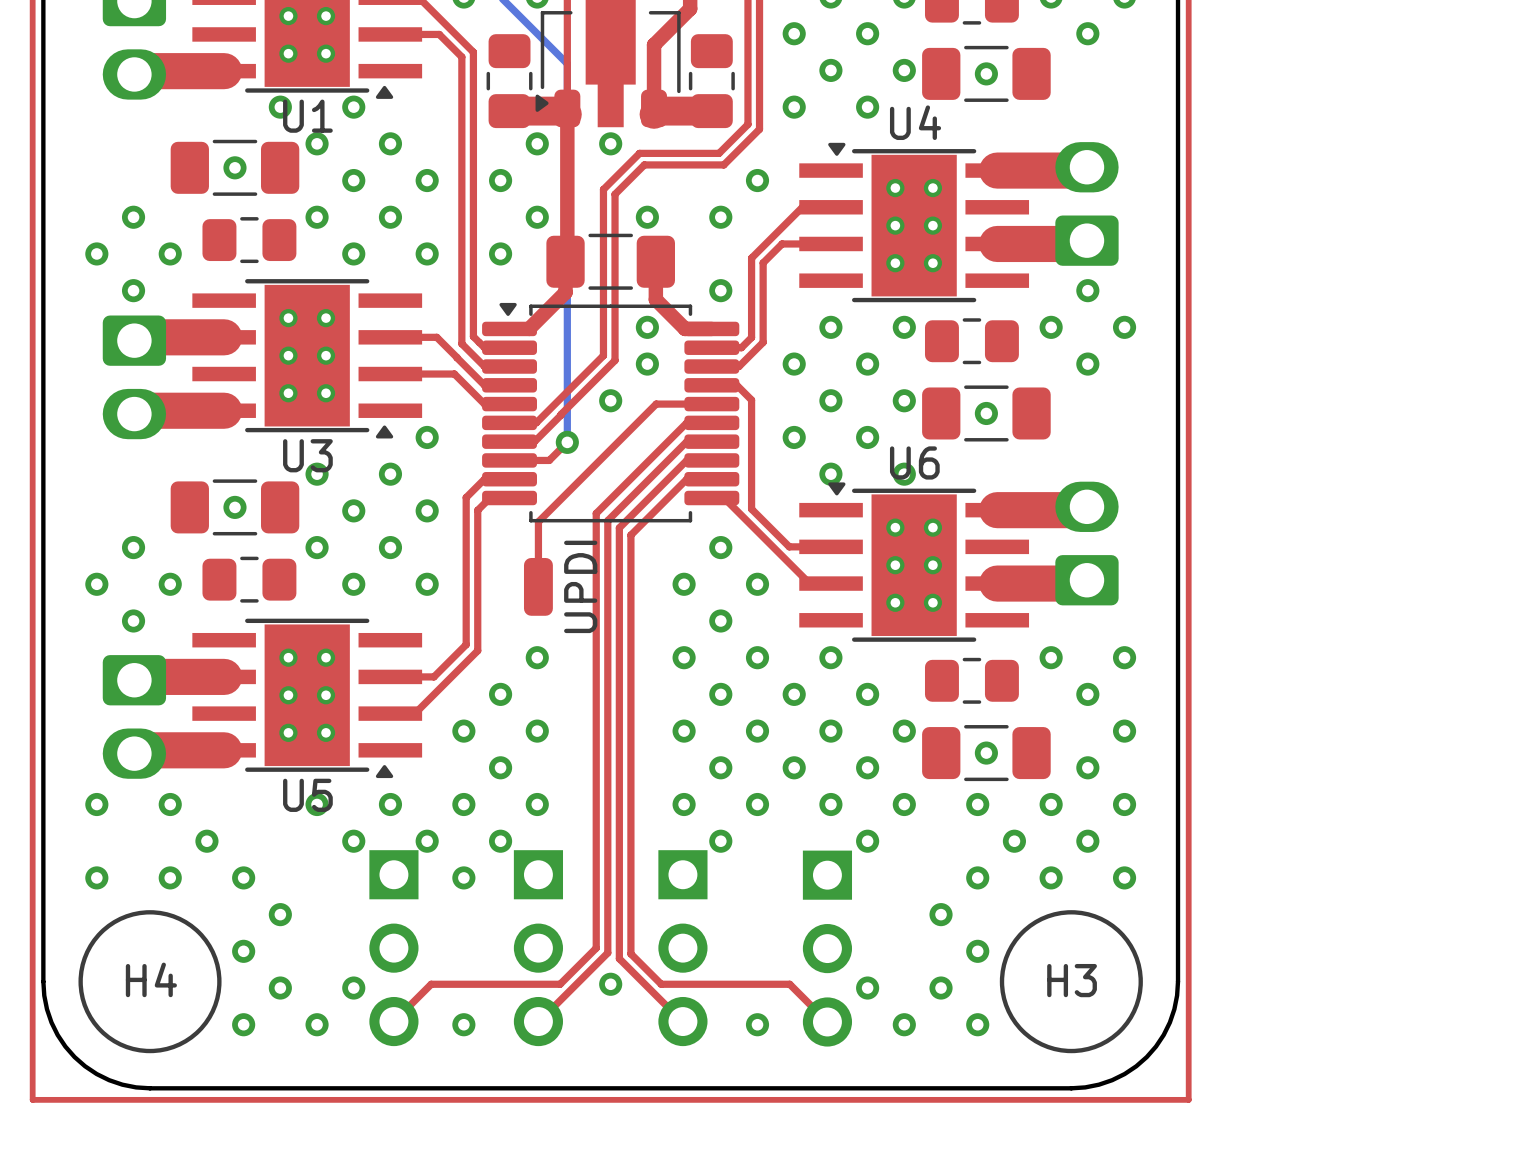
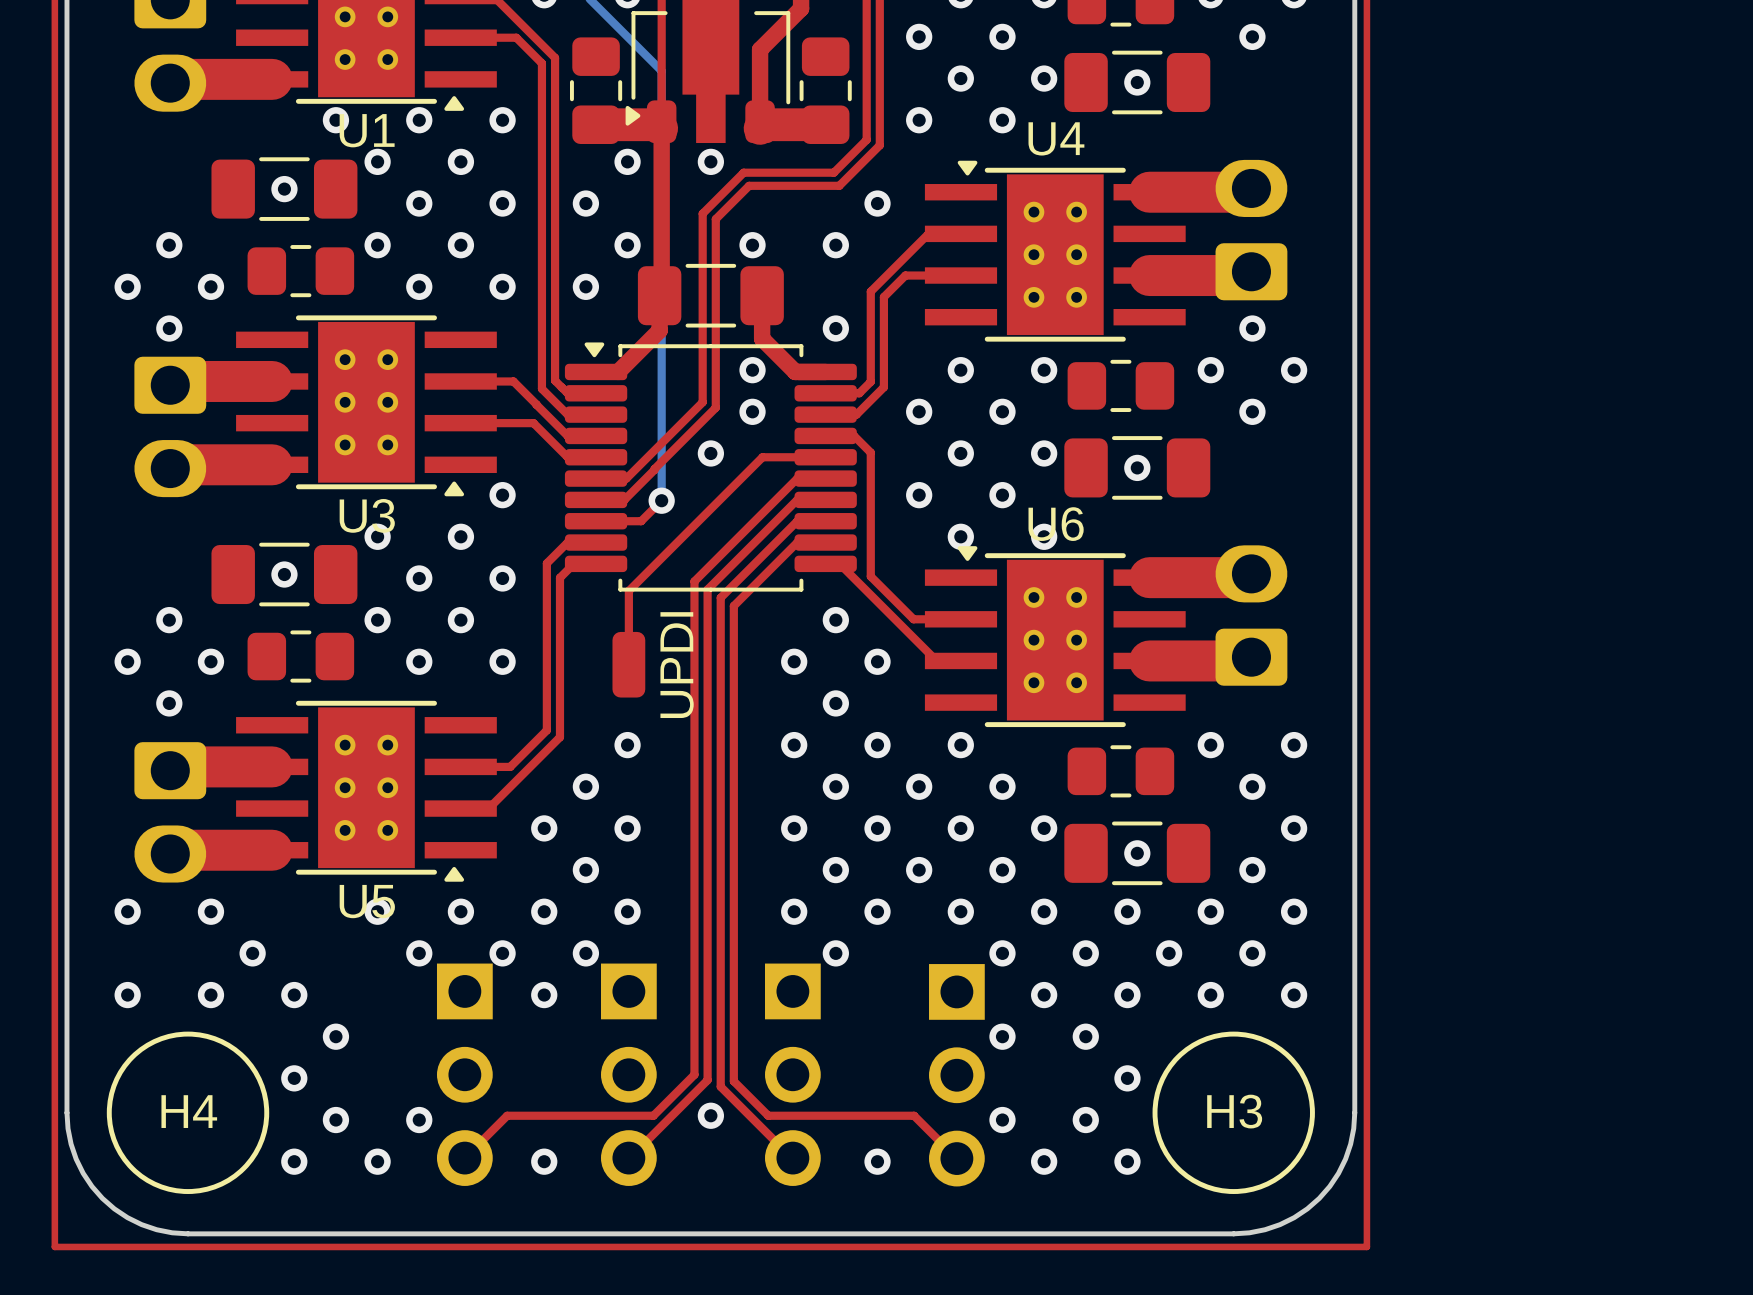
via: none -> (502, 120)
via: none -> (1085, 953)
via: none -> (1044, 995)
via: none -> (1002, 1036)

